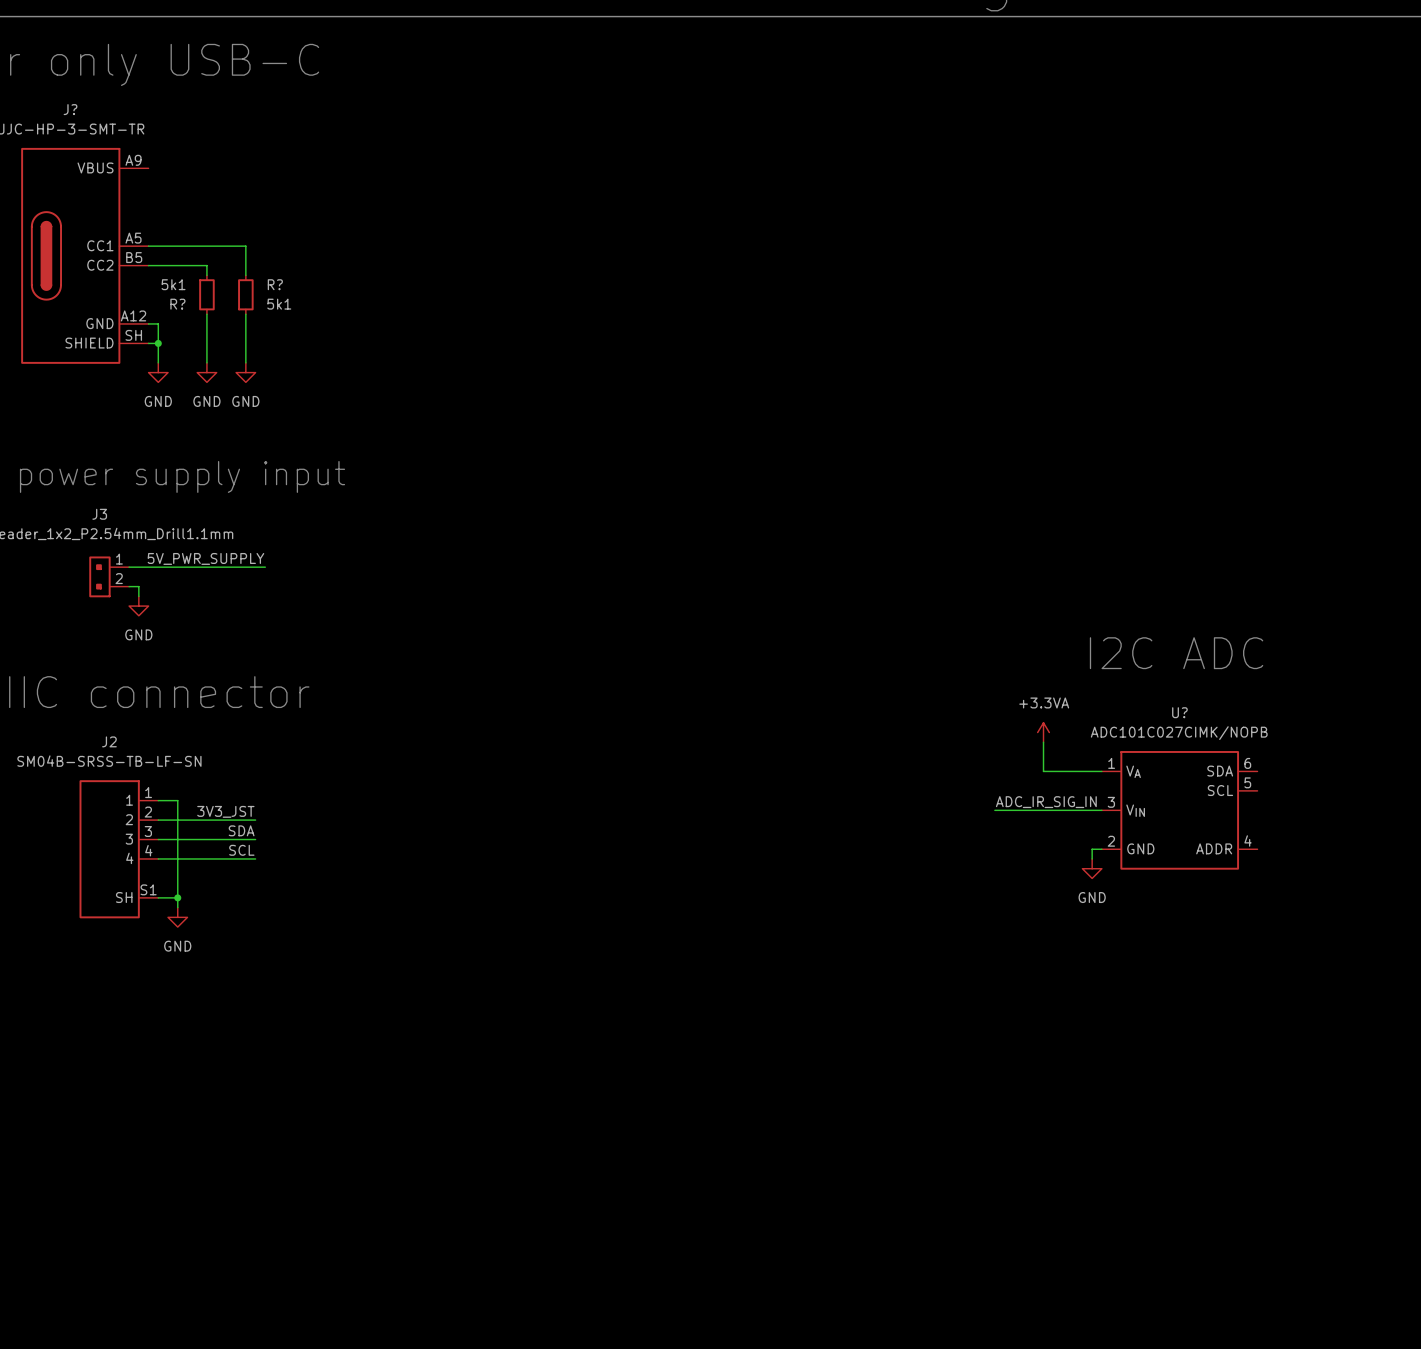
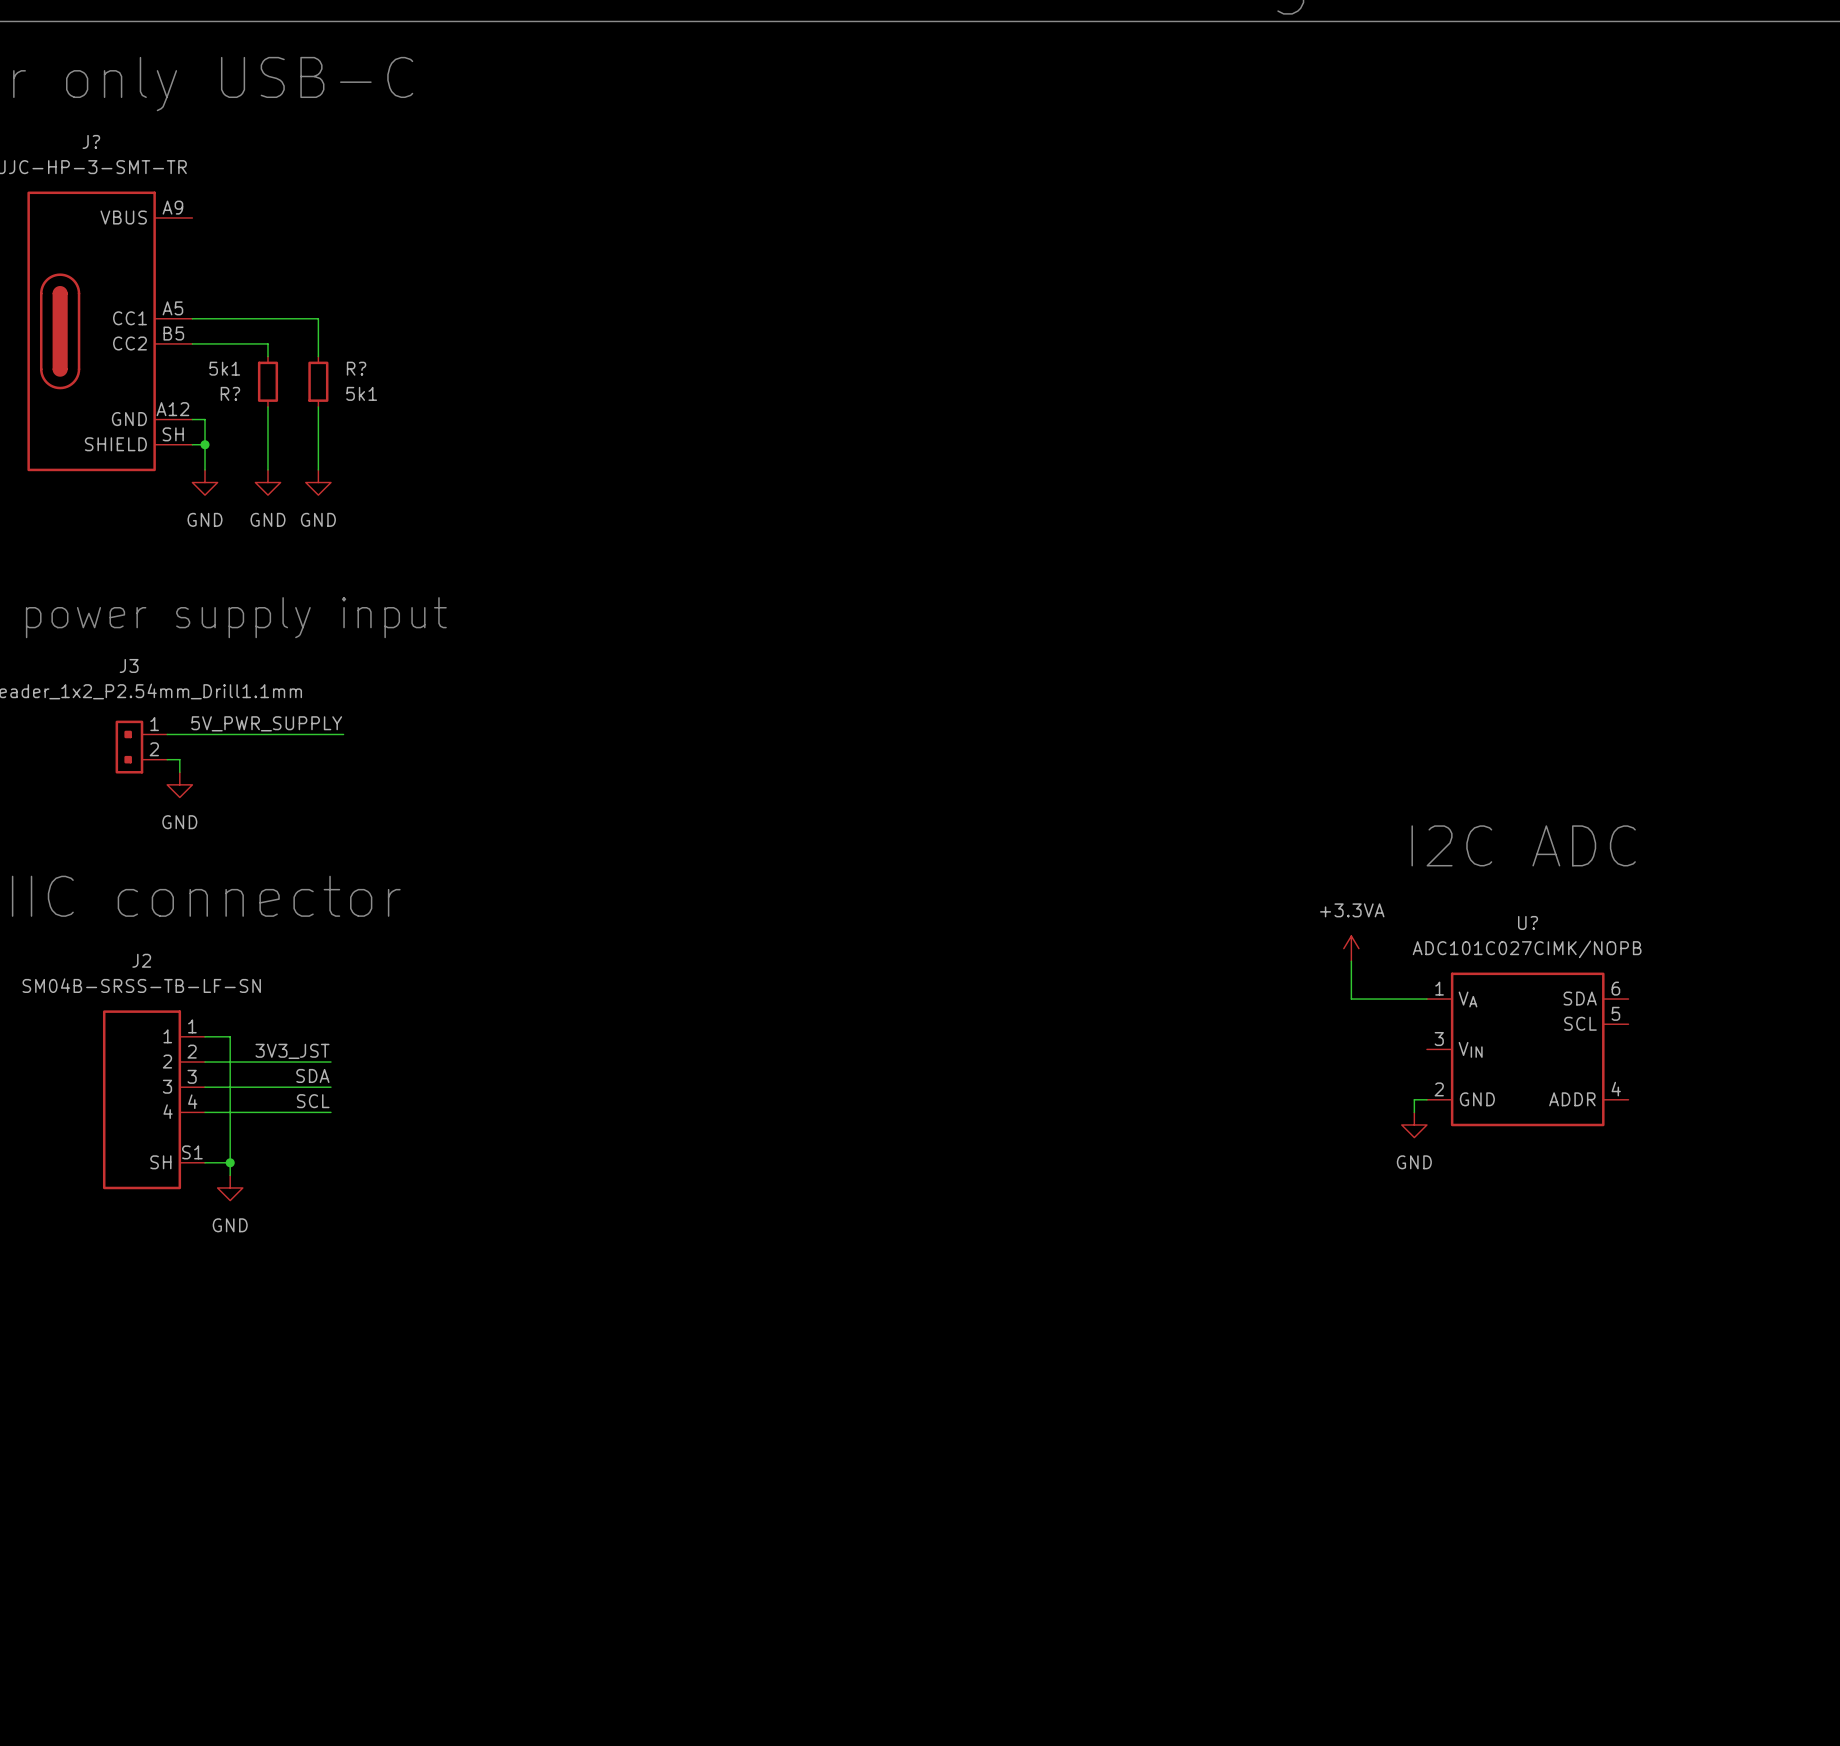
label: ADC_IR_SIG_IN (1046, 802) -> none
wire: (994, 810) (1101, 810) -> none

